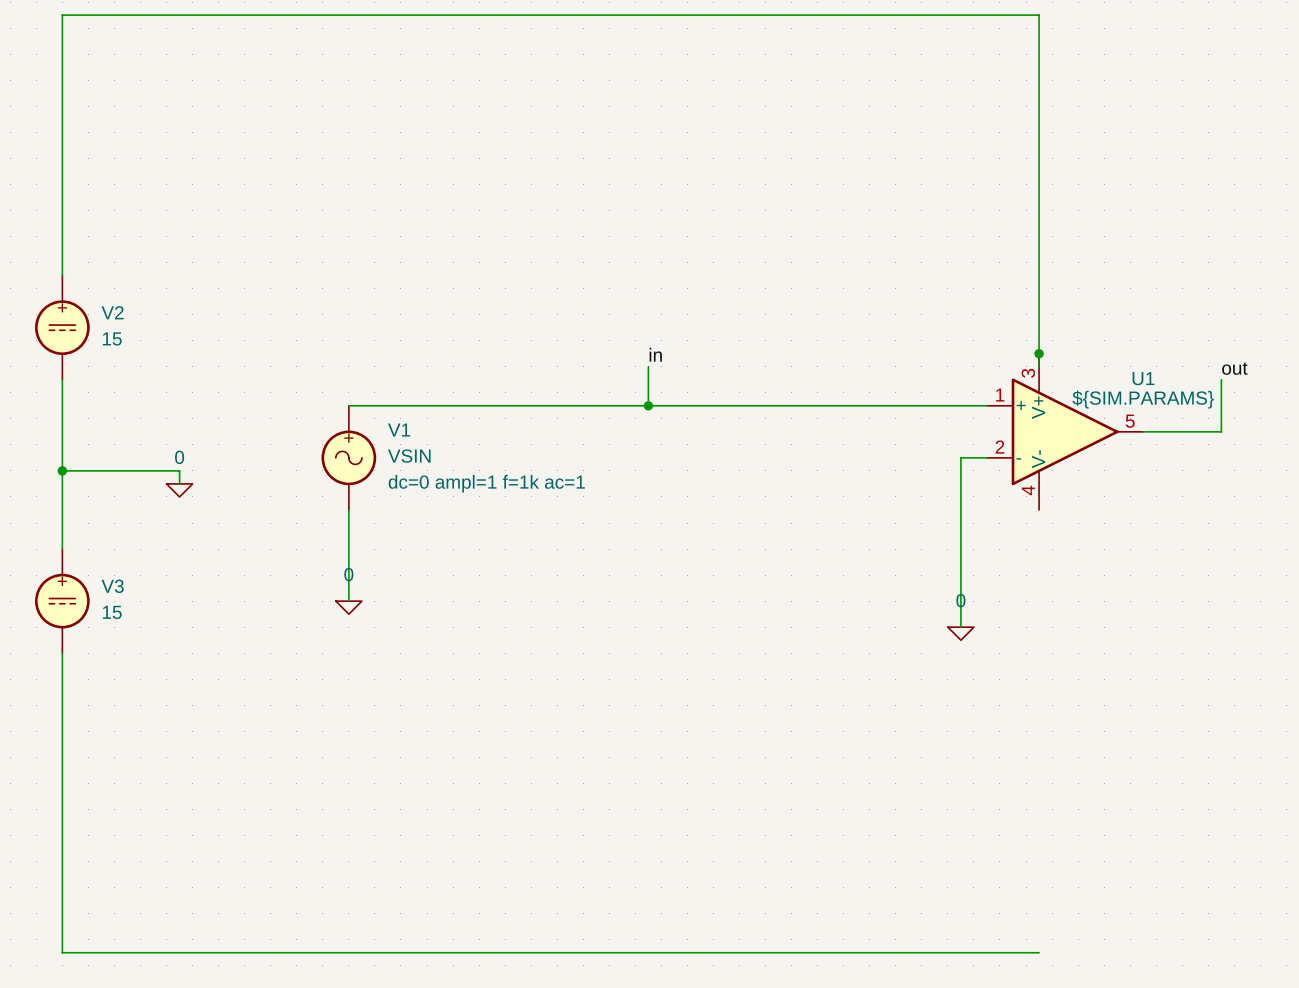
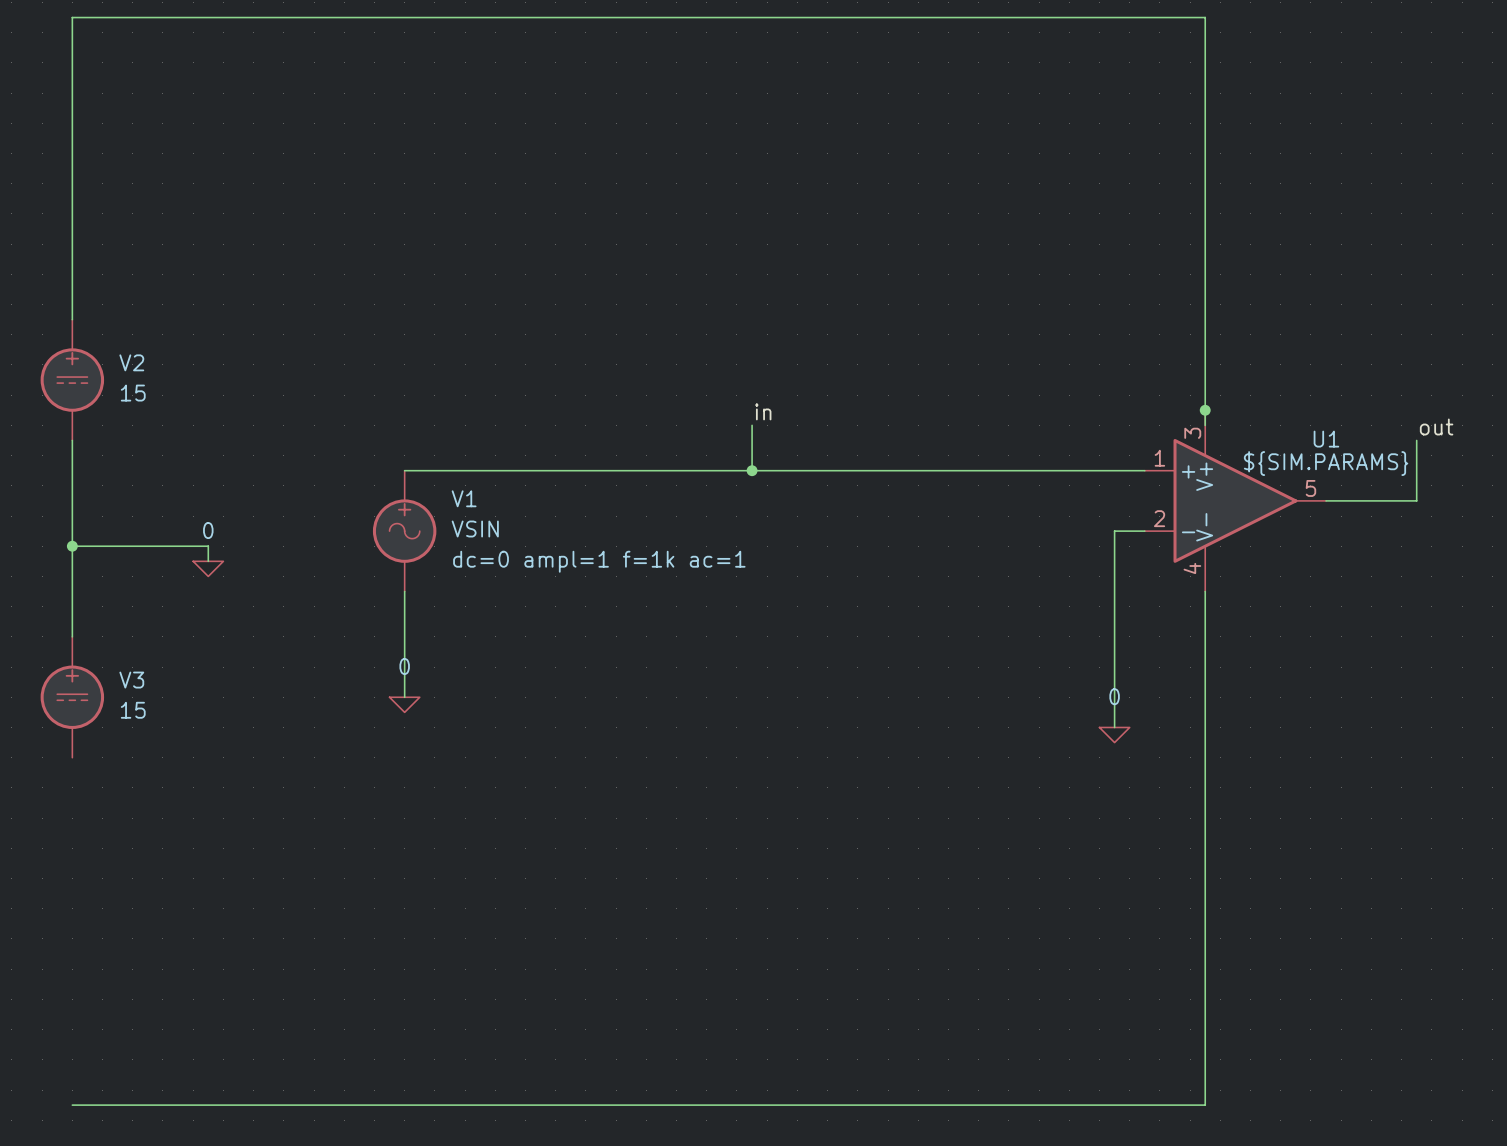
wire: none -> (1205, 591) (1205, 1105)
wire: (62, 653) (62, 952) -> none

